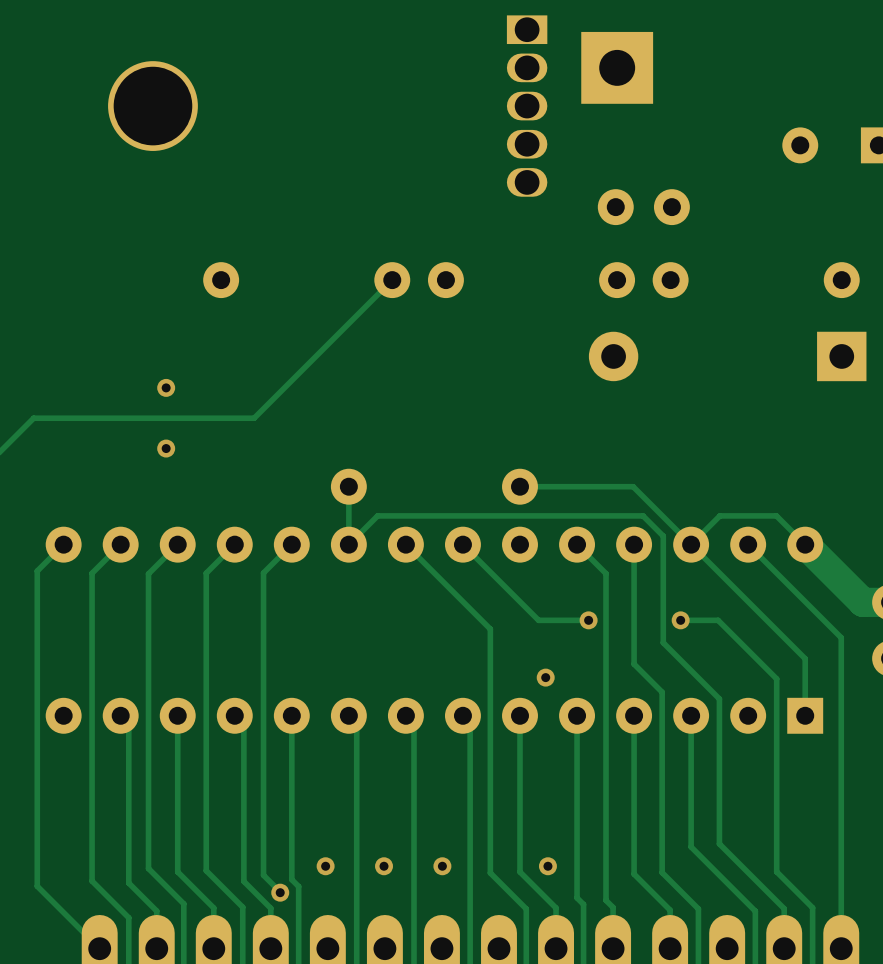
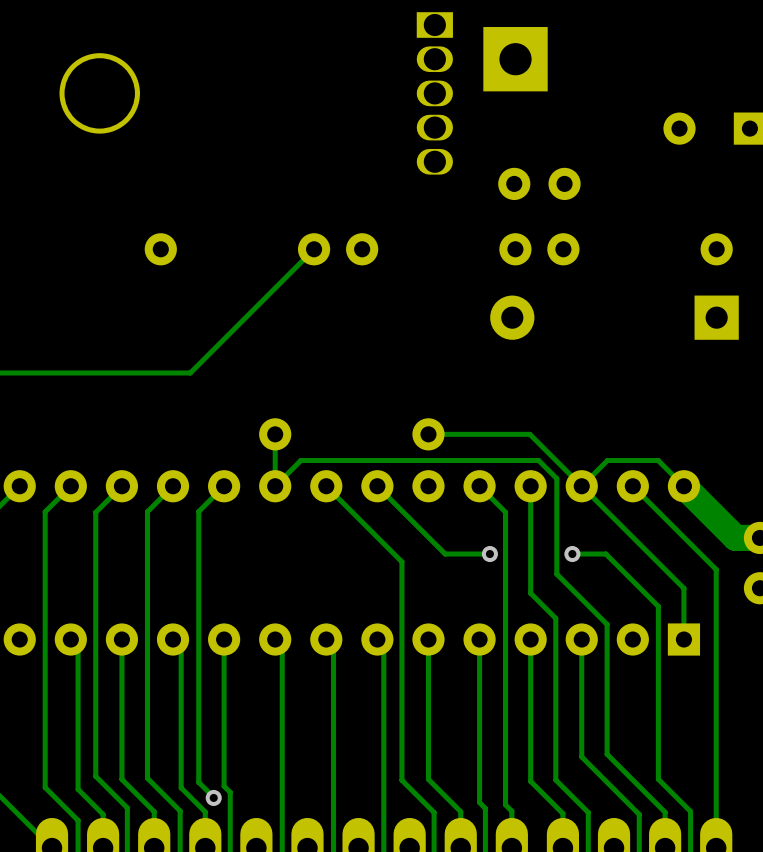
via: (166, 387) -> none
via: (166, 448) -> none
via: (545, 677) -> none
via: (325, 866) -> none
via: (384, 866) -> none
via: (442, 866) -> none
via: (547, 866) -> none

